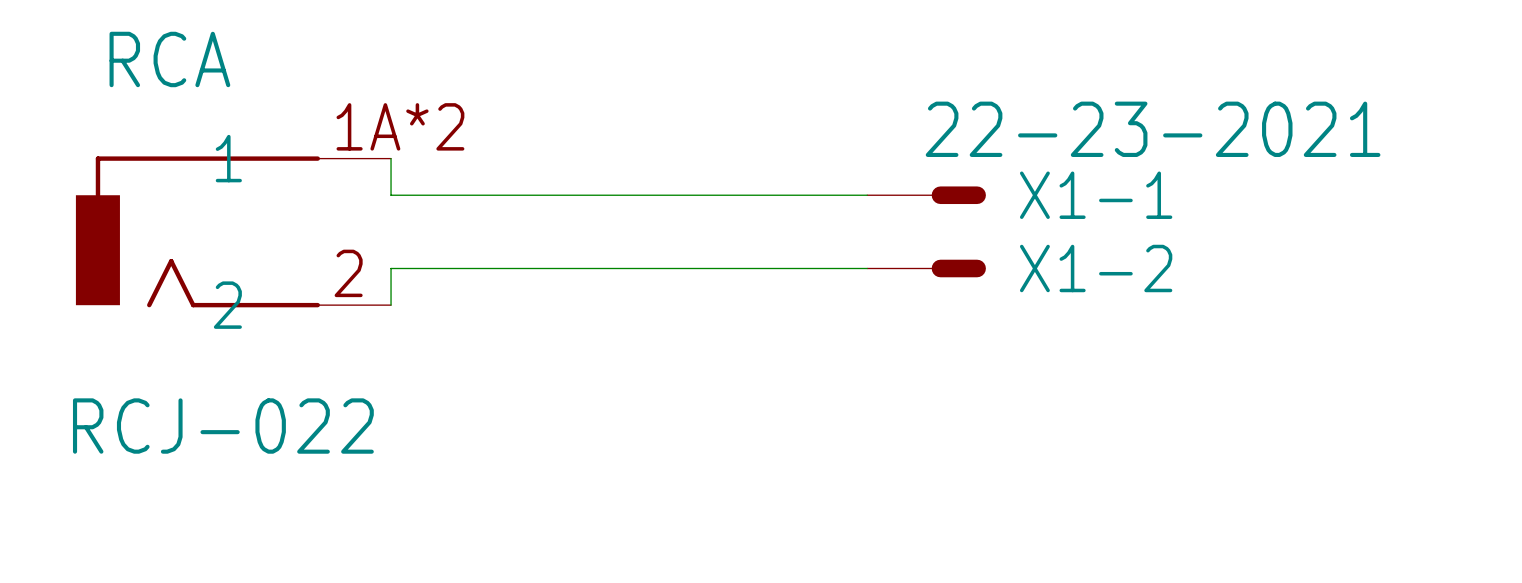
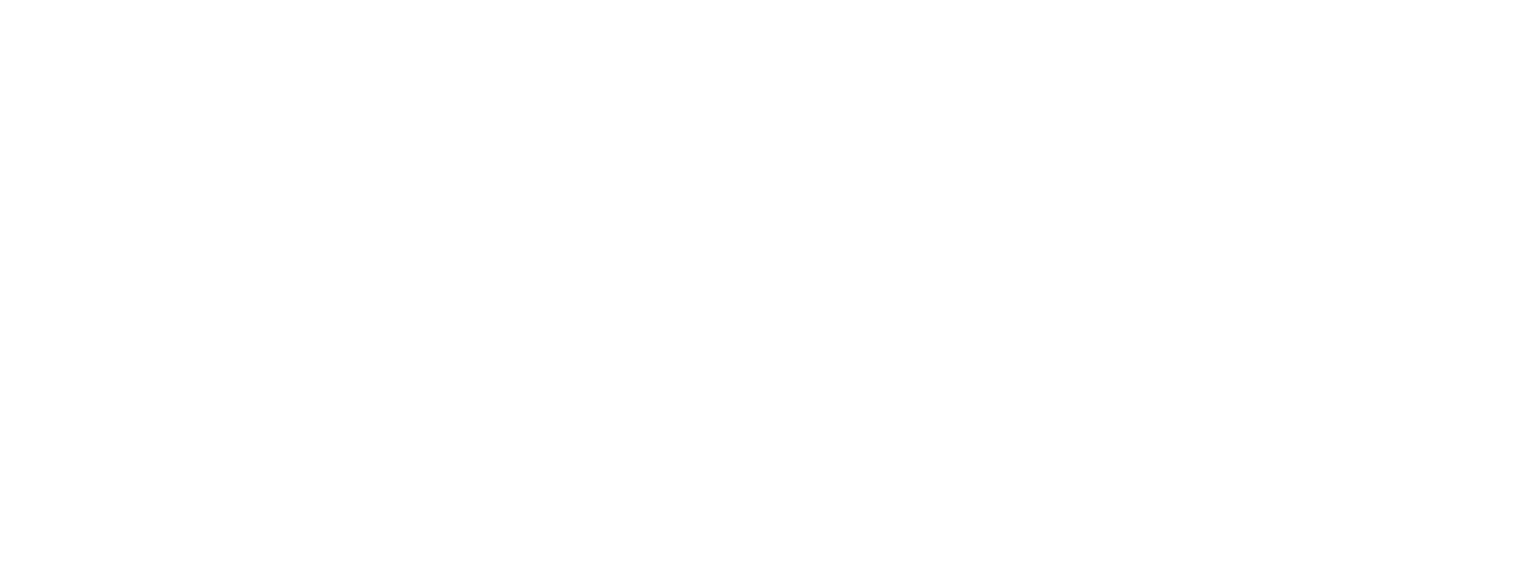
wire: (391, 158) (391, 195) (867, 195) -> none
X1-1: 22-23-2021 (926, 195) -> none
RCA: RCJ-022 (233, 231) -> none
wire: (867, 268) (391, 268) (391, 305) -> none
X1-2: (926, 268) -> none

